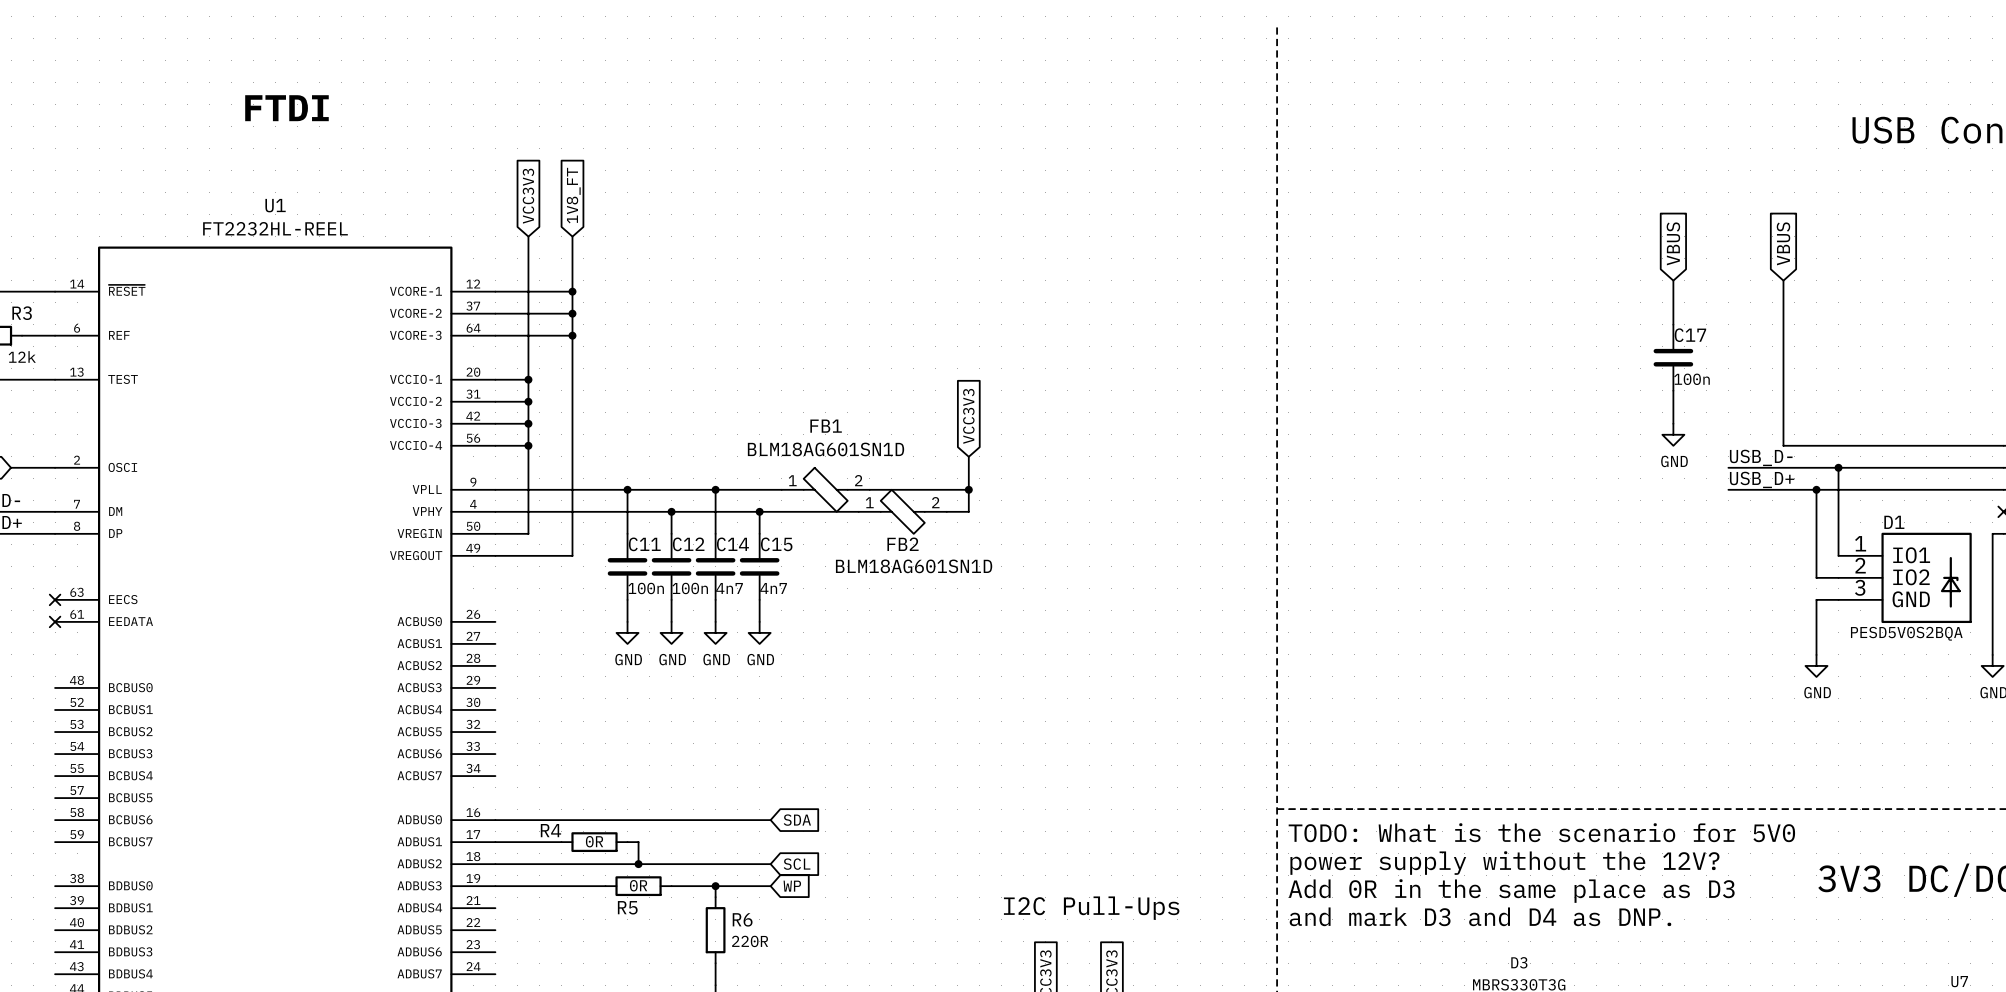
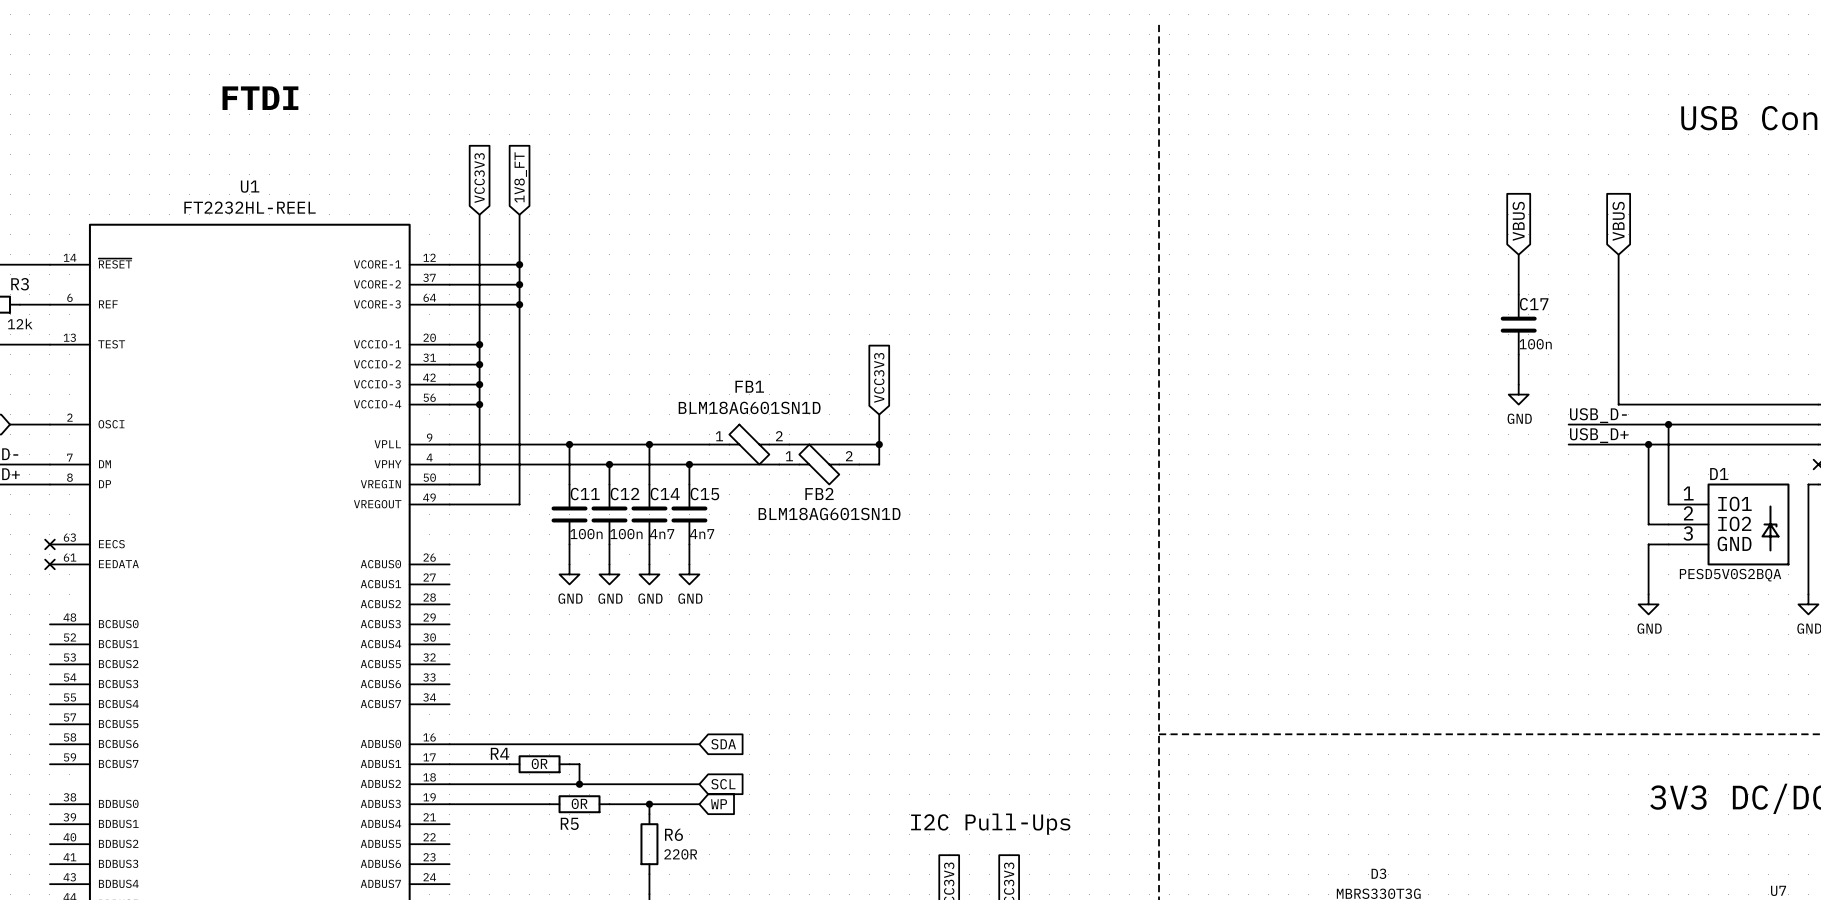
text: TODO: What is the scenario for 5V0 (1541, 832) -> none
text: power supply without the 12V? (1504, 863) -> none
text: Add 0R in the same place as D3 (1511, 891) -> none
text: and mark D3 and D4 as DNP. (1480, 916) -> none

